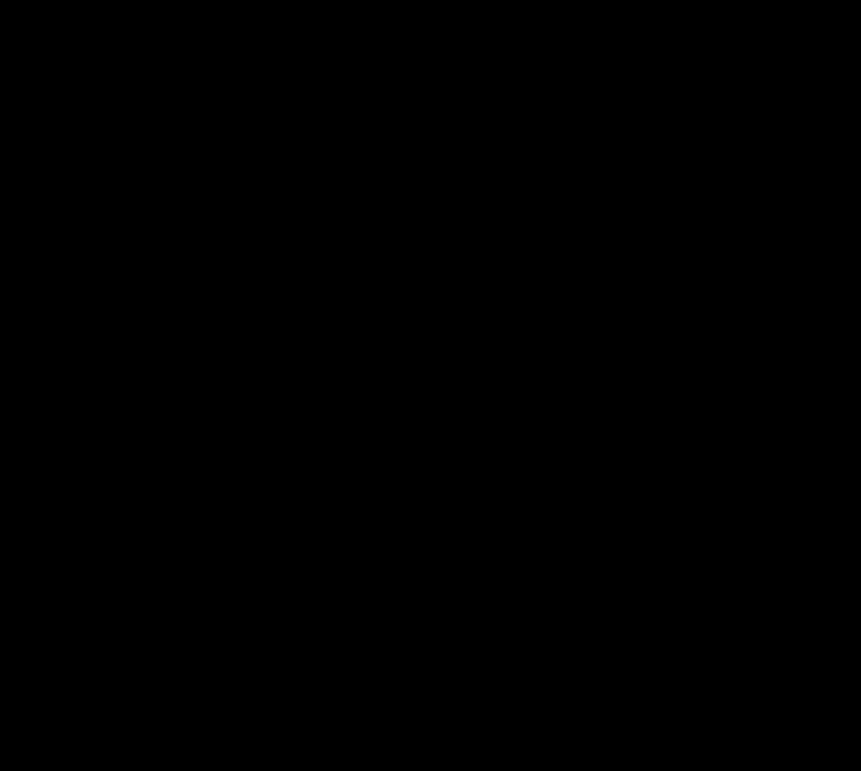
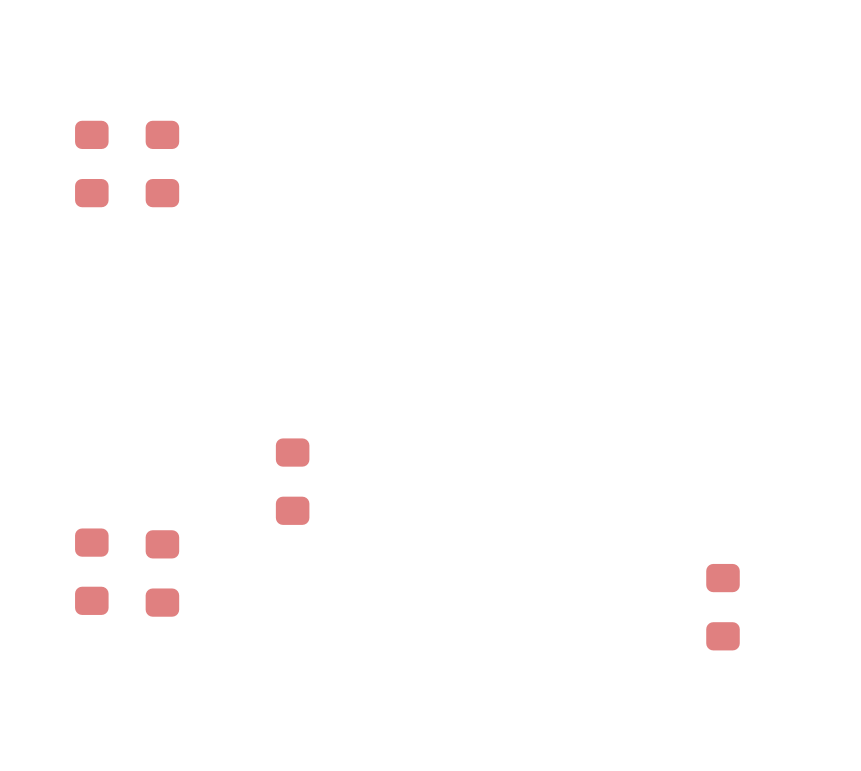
part: none -> (91, 164)
part: none -> (162, 164)
part: none -> (292, 481)
part: none -> (91, 571)
part: none -> (162, 573)
part: none -> (723, 607)

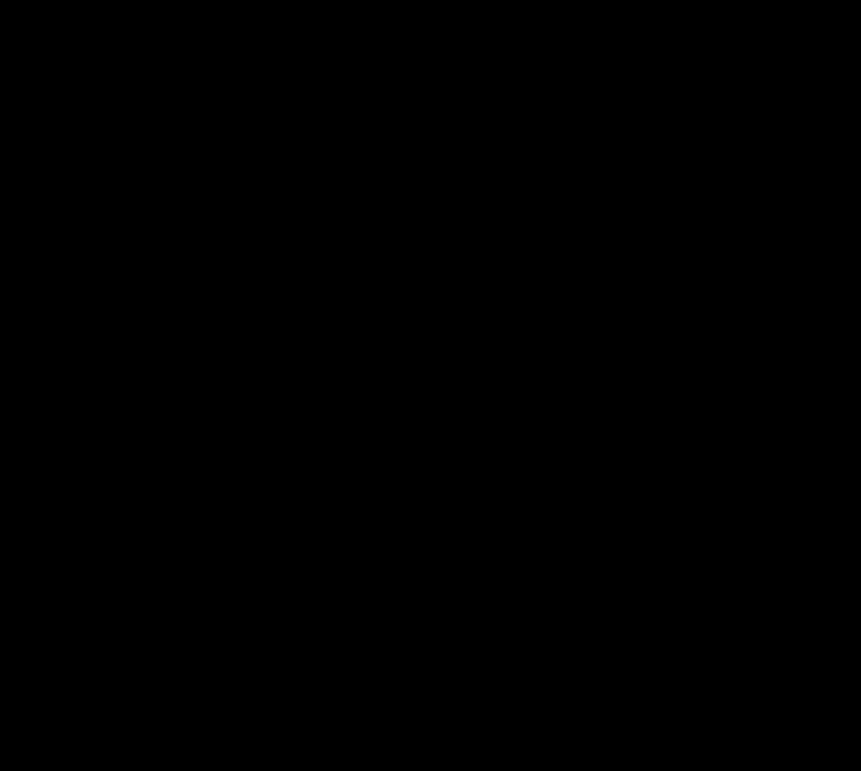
part: (91, 164) -> none
part: (162, 164) -> none
part: (292, 481) -> none
part: (91, 571) -> none
part: (162, 573) -> none
part: (723, 607) -> none

